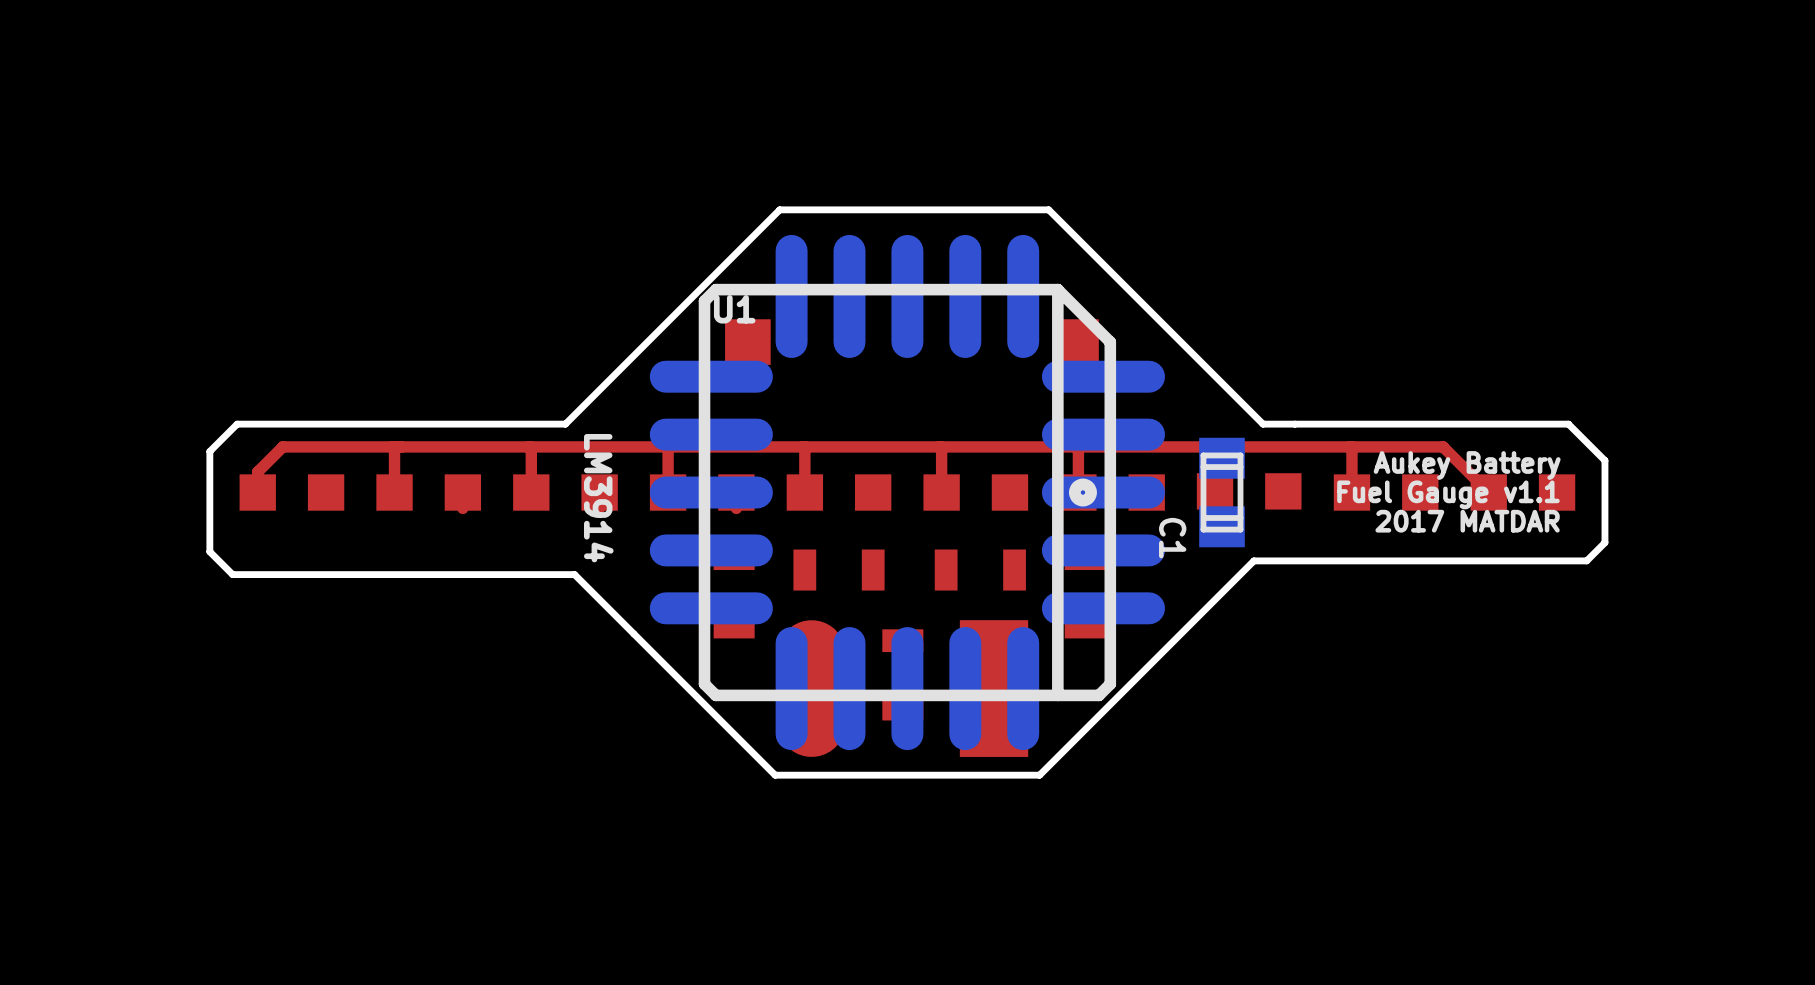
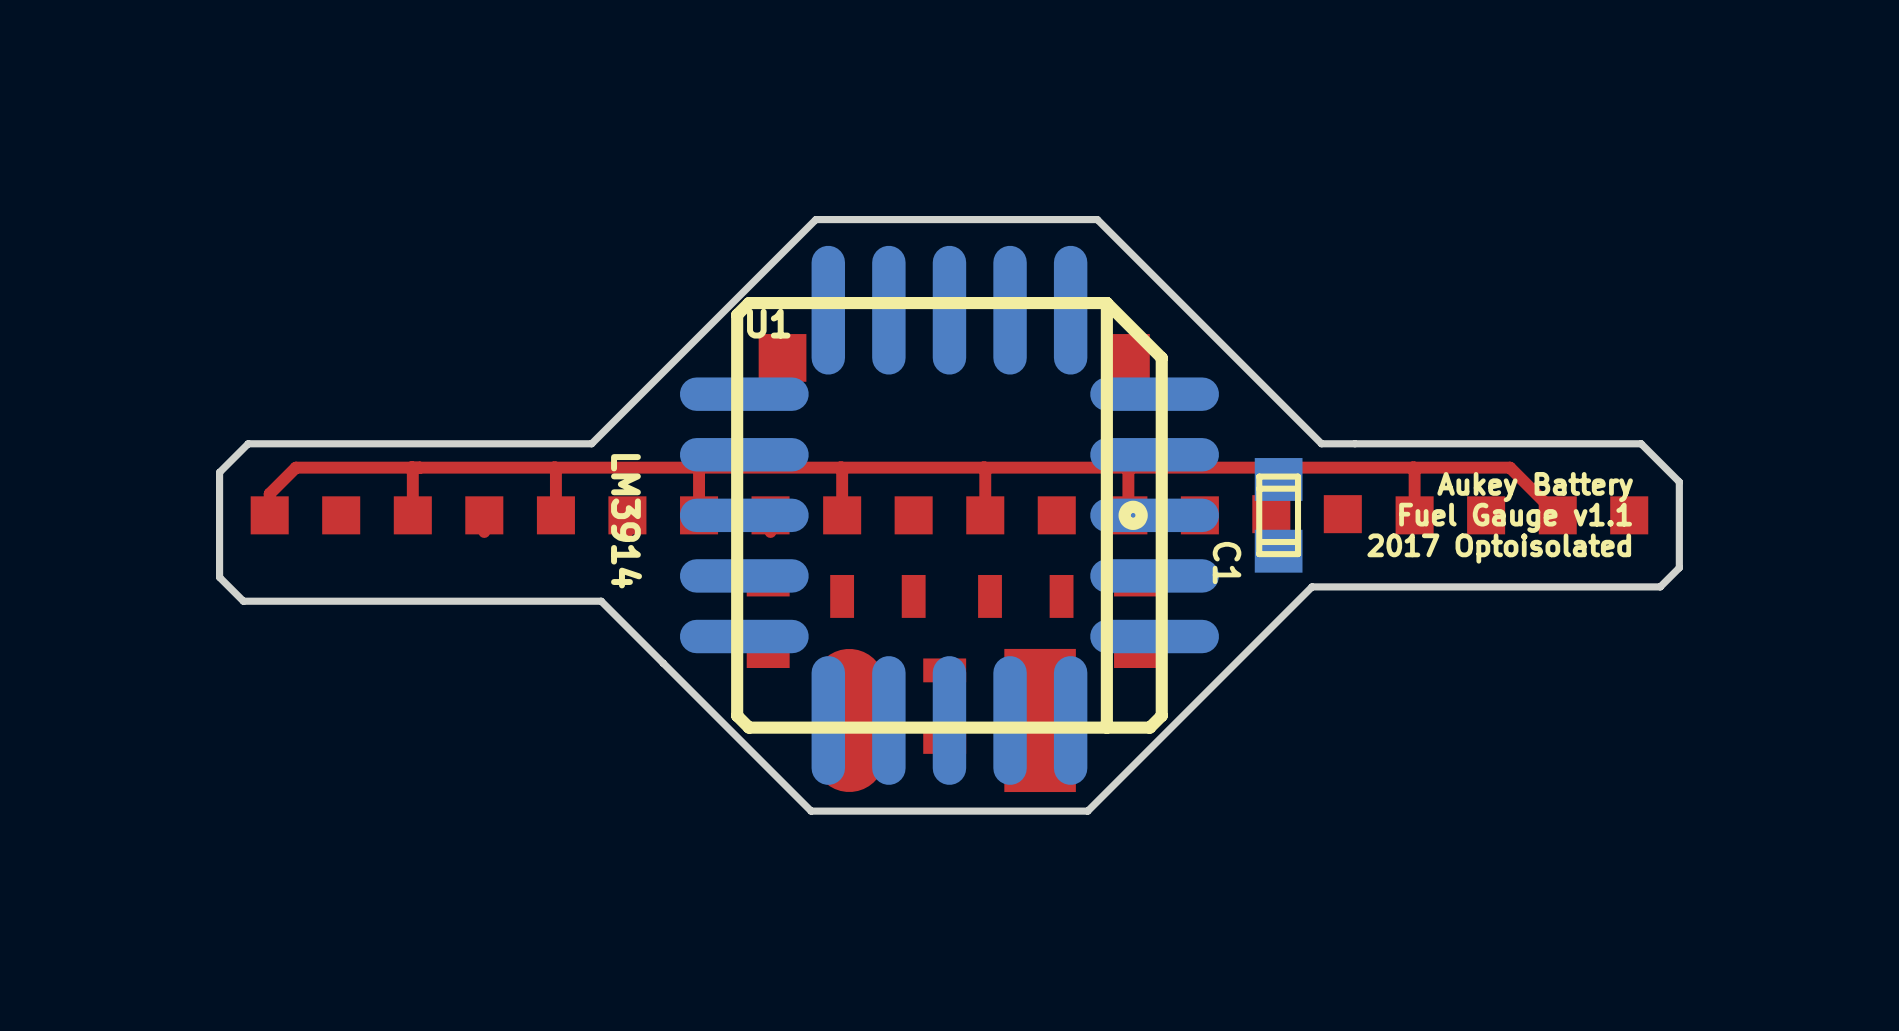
text: 2017 MATDAR (1467, 521) -> 2017 Optoisolated (1499, 548)

